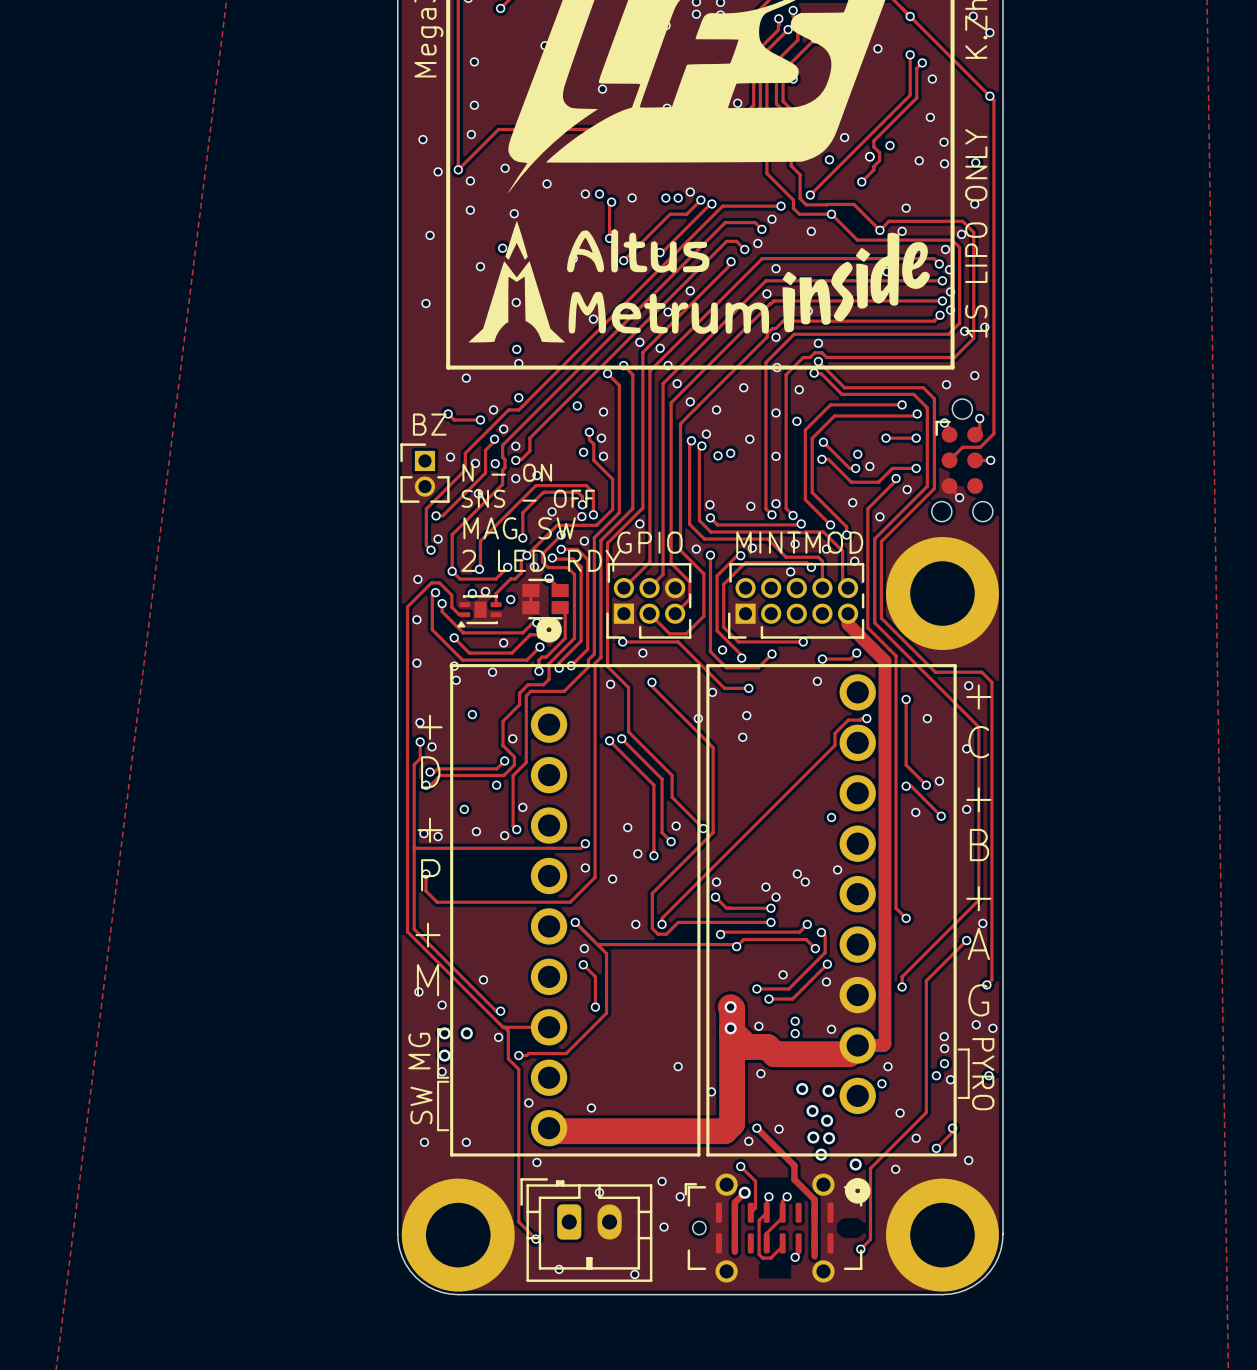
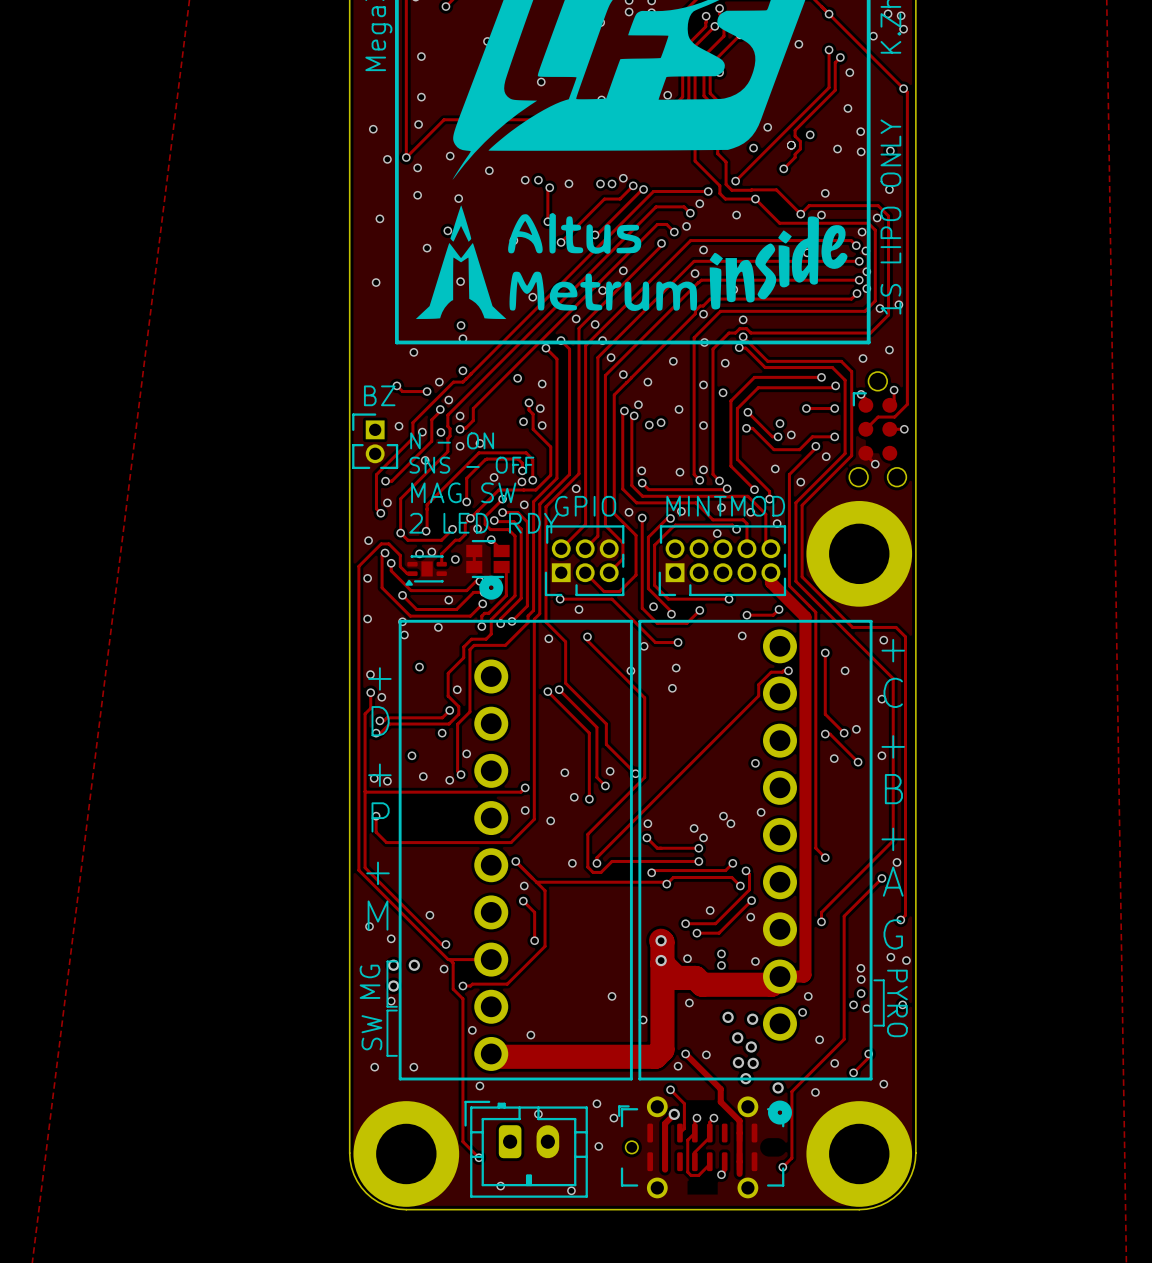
via: none -> (901, 15)
via: none -> (873, 36)

